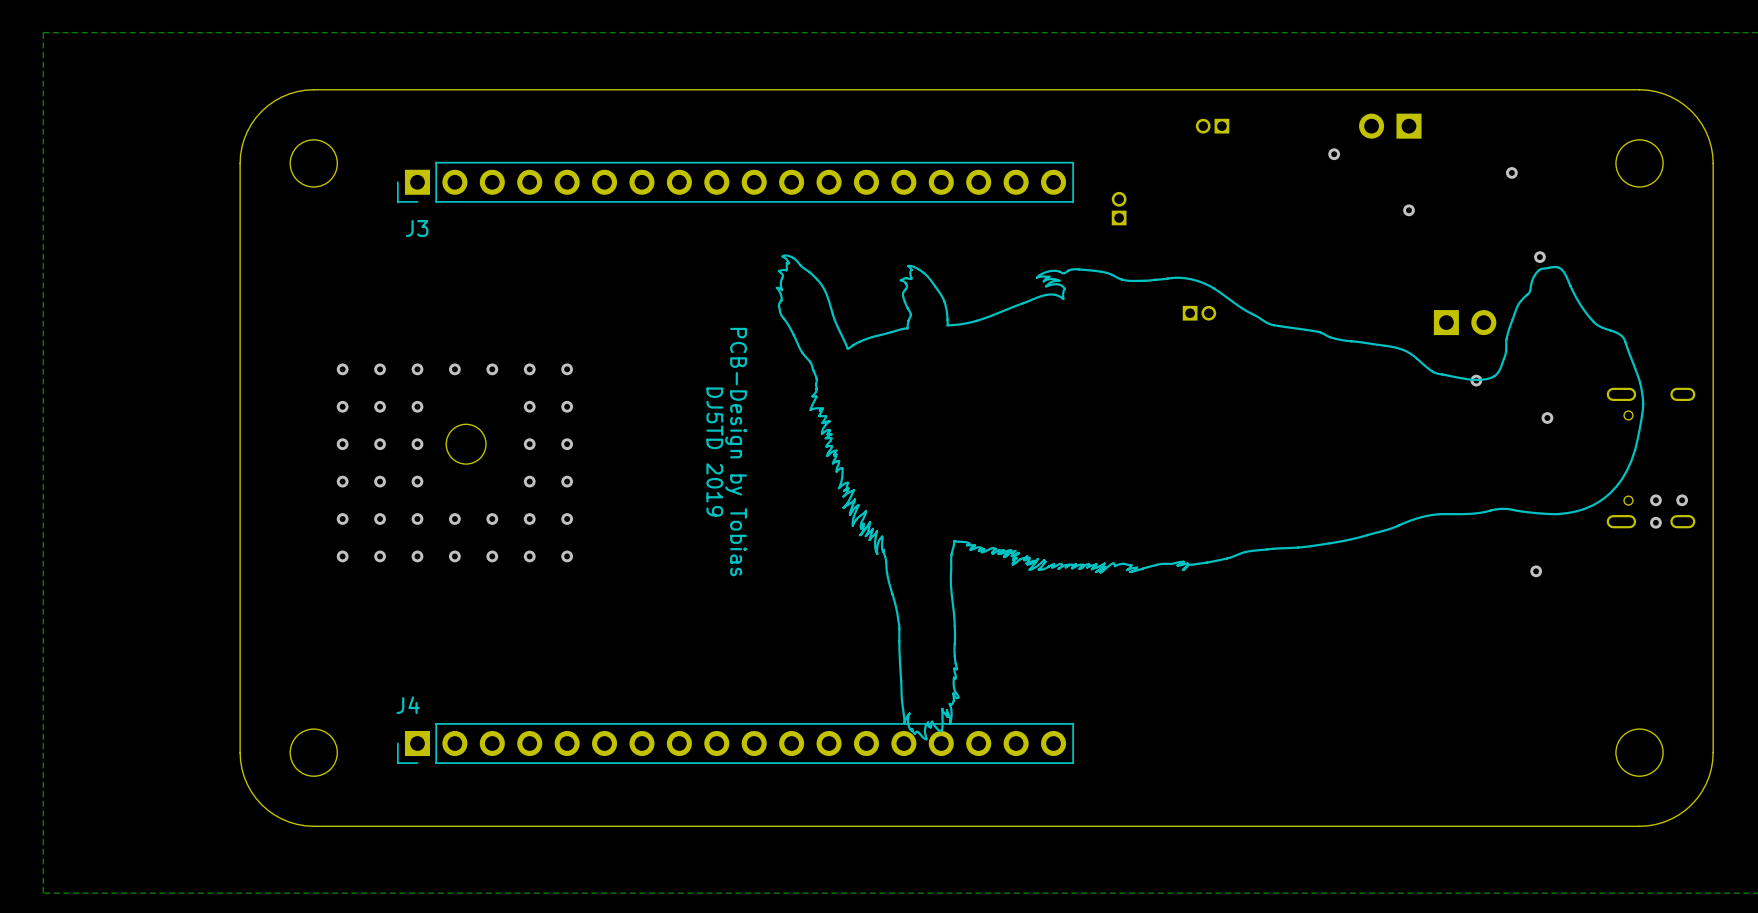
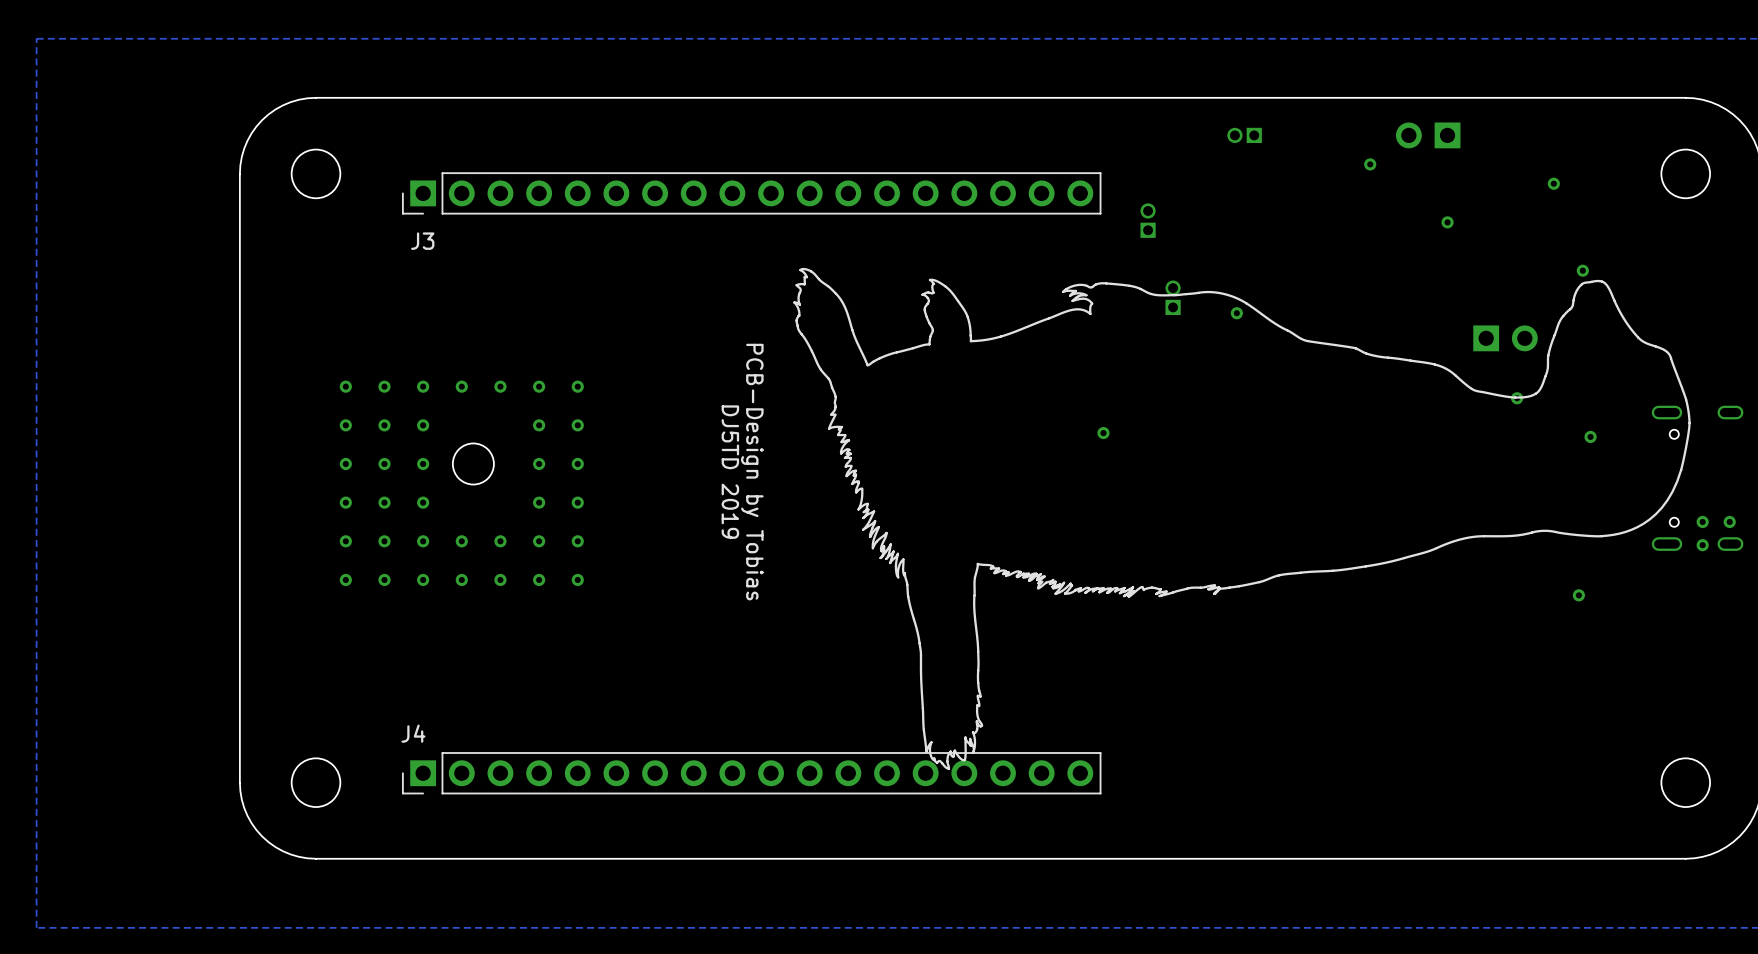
via: none -> (1236, 313)
part rotation: 0° (1199, 313) -> 90° counterclockwise (1173, 297)
part position: (1199, 313) -> (1173, 297)
via: none -> (1103, 433)

